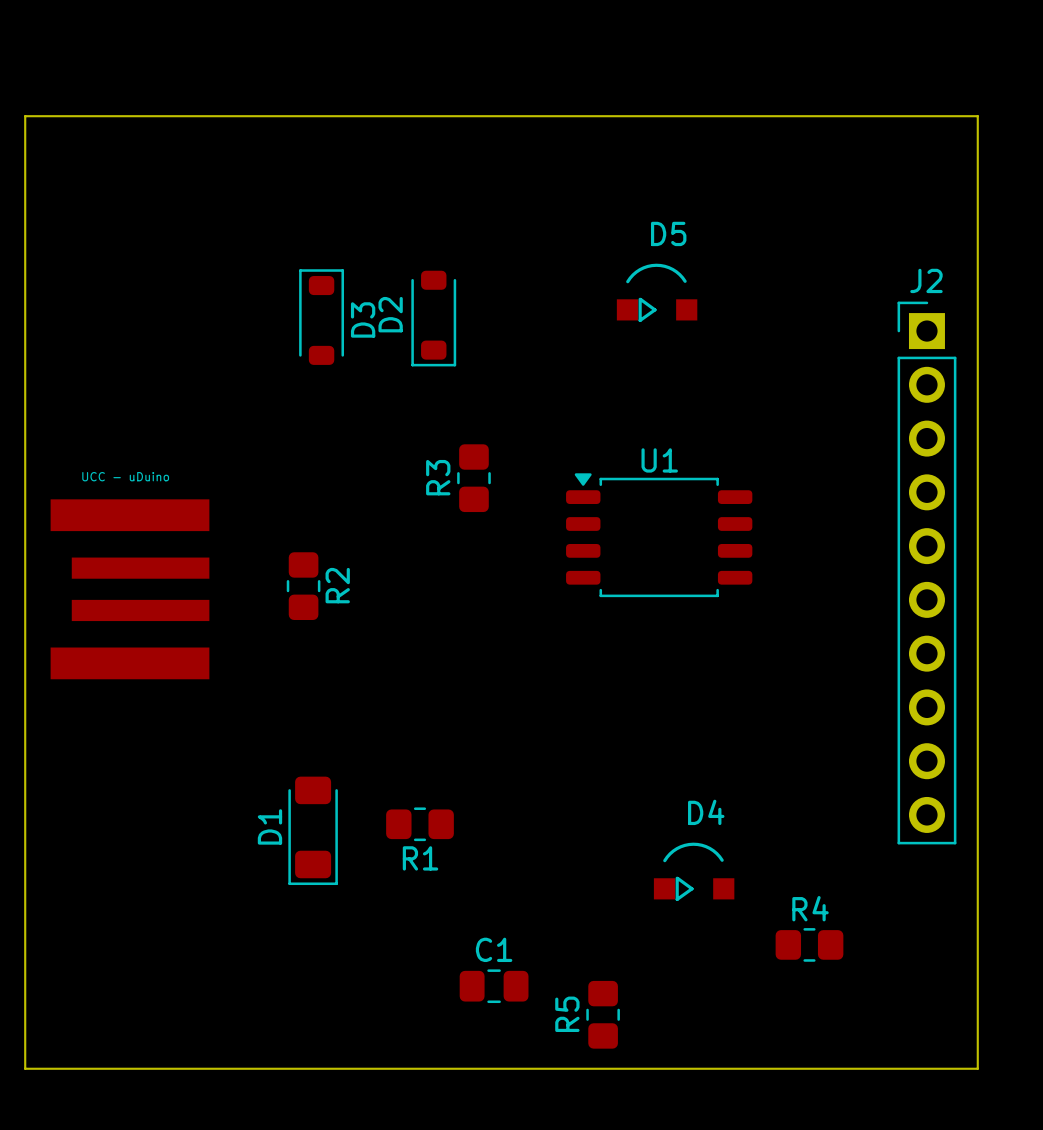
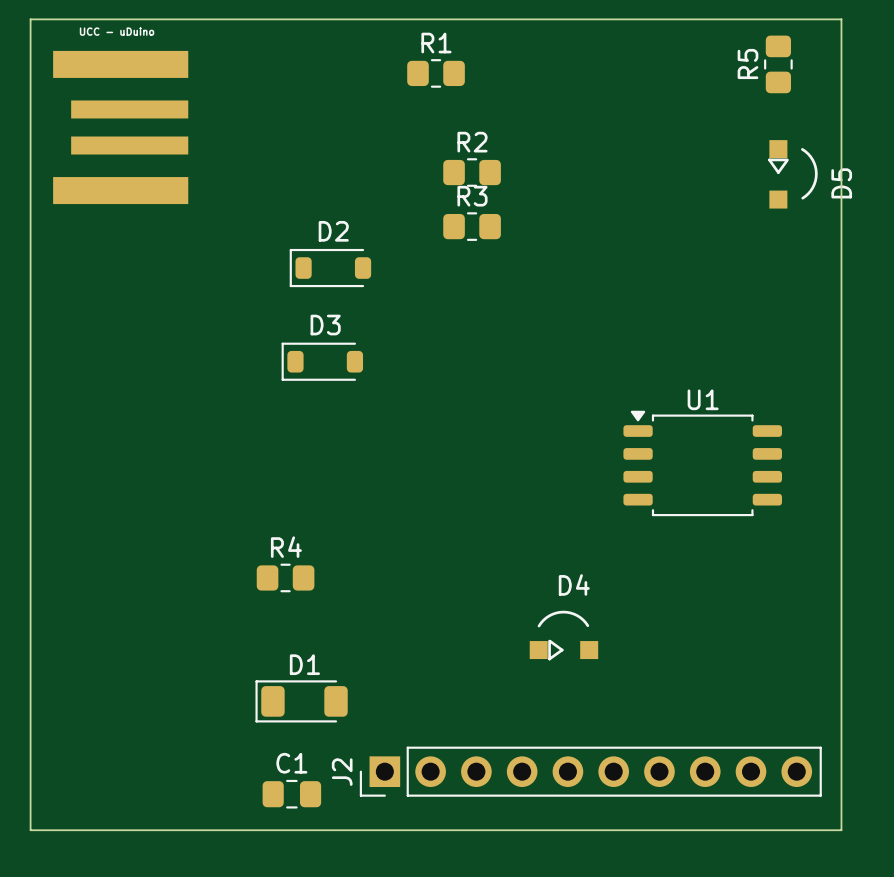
D5 rotation: 0° (657, 292) -> 90° clockwise (792, 174)
D5 position: (657, 292) -> (792, 174)
D3 rotation: 0° (321, 317) -> 90° counterclockwise (322, 361)
D3 position: (321, 317) -> (322, 361)
D2 rotation: 0° (433, 318) -> 90° clockwise (330, 268)
D2 position: (433, 318) -> (330, 268)
R3 rotation: 0° (473, 478) -> 90° clockwise (472, 226)
R3 position: (473, 478) -> (472, 226)
U1 position: (659, 535) -> (702, 463)
J2 rotation: 0° (926, 573) -> 90° counterclockwise (590, 771)
J2 position: (926, 573) -> (590, 771)
R2 name position: R2 (337, 585) -> R2 (472, 142)
R2 rotation: 0° (303, 586) -> 90° clockwise (472, 172)
R2 position: (303, 586) -> (472, 172)
part position: (129, 589) -> (120, 127)
R1 position: (420, 824) -> (436, 73)
D1 rotation: 0° (313, 830) -> 90° clockwise (301, 701)
D1 position: (313, 830) -> (301, 701)
R1 name position: R1 (420, 858) -> R1 (436, 43)
D4 position: (694, 871) -> (563, 635)
R4 position: (809, 944) -> (285, 577)
C1 position: (494, 986) -> (291, 794)
R5 position: (603, 1014) -> (778, 64)

